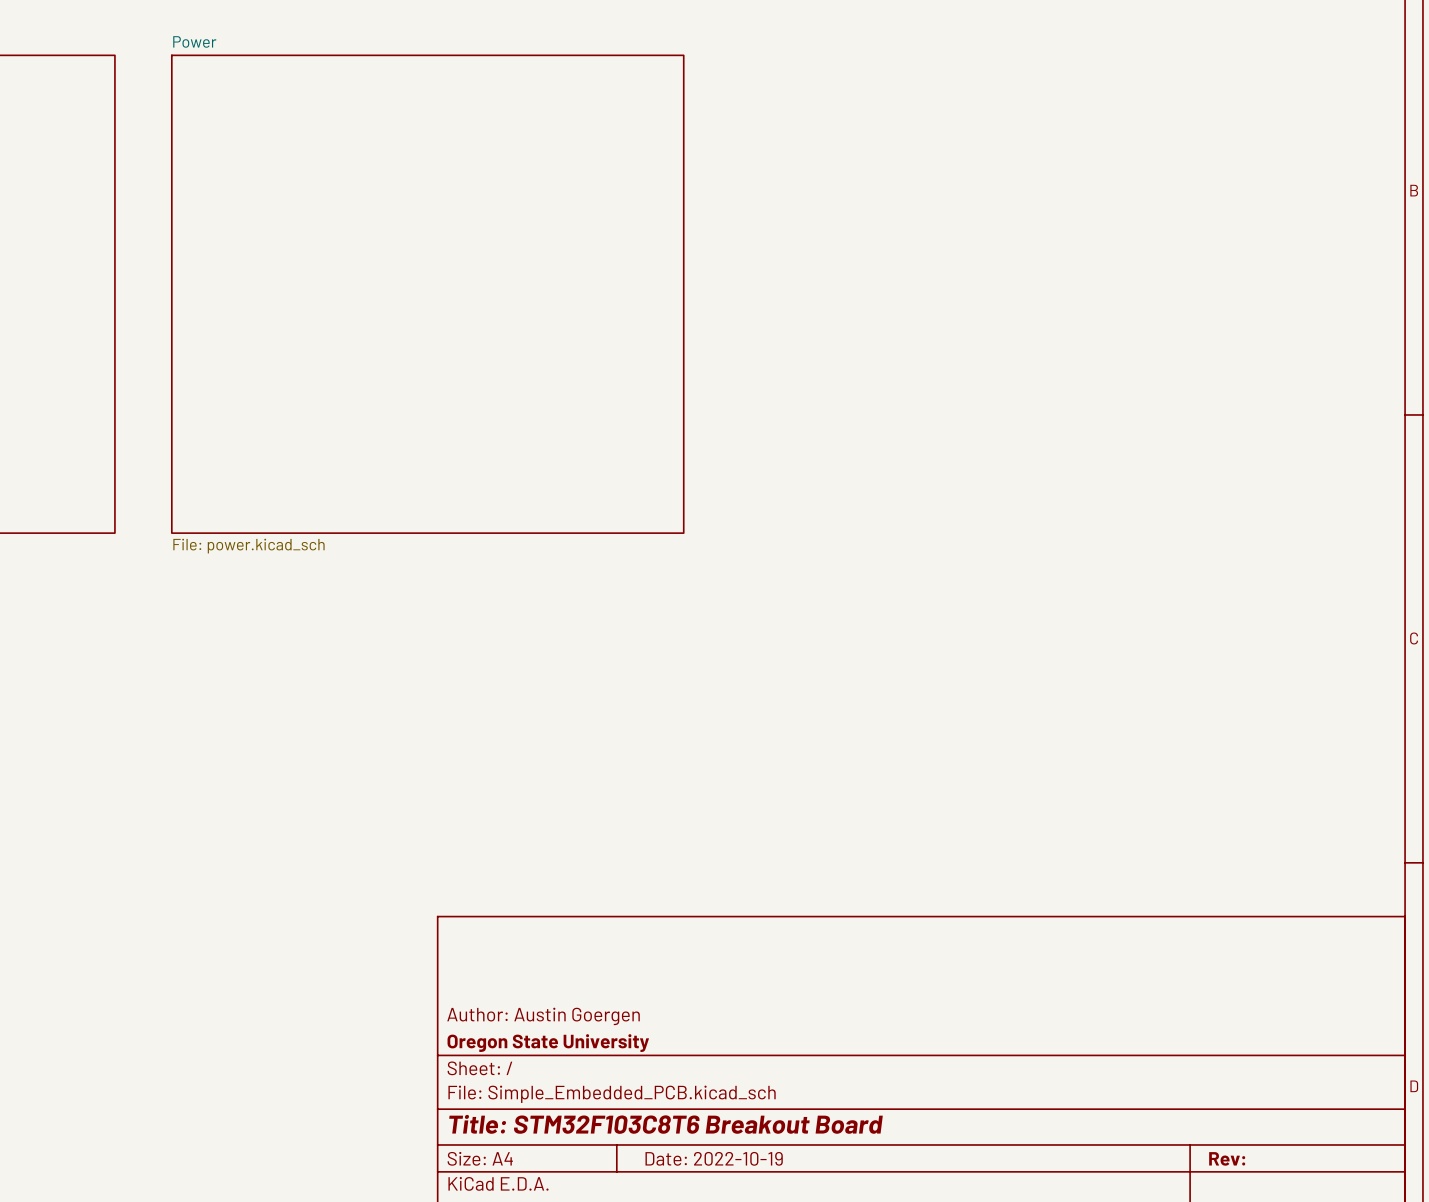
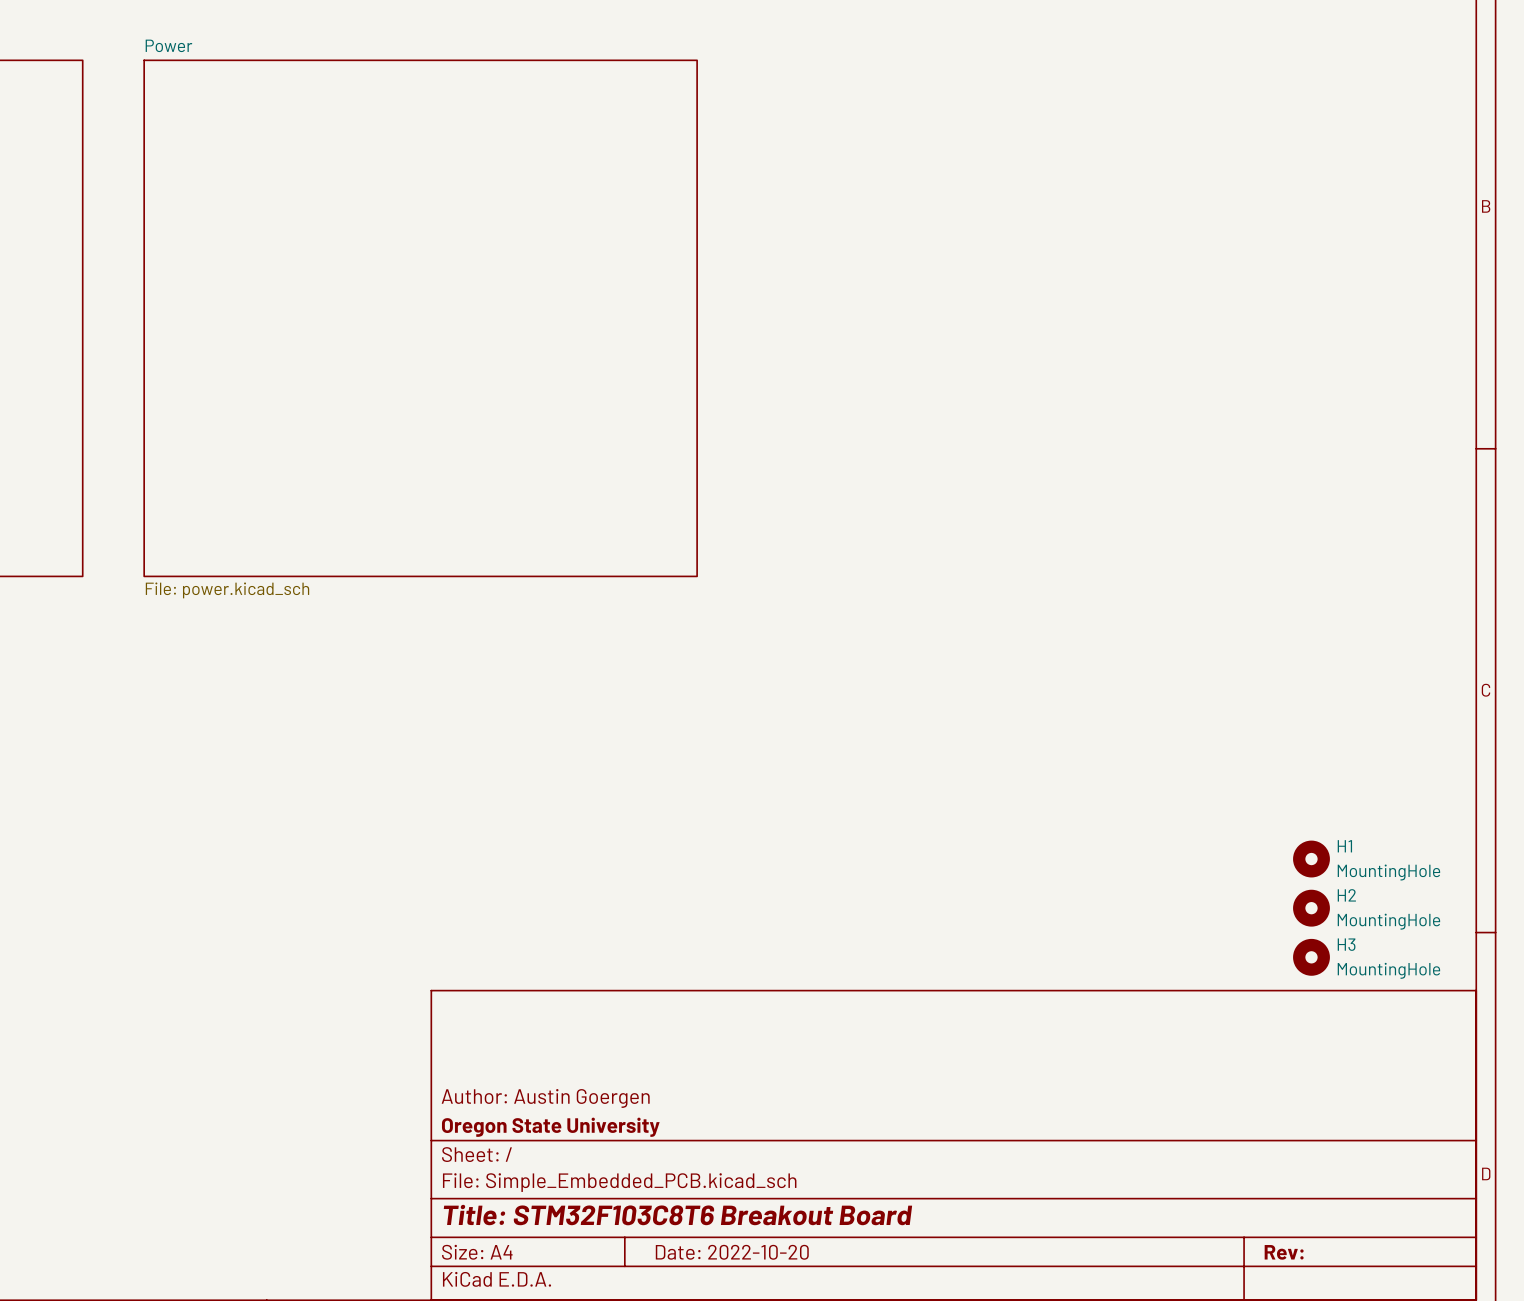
H1: none -> MountingHole (1311, 859)
H2: none -> MountingHole (1311, 908)
H3: none -> MountingHole (1311, 957)
title block: Date: 2022-10-19 (714, 1158) -> Date: 2022-10-20 (732, 1252)

